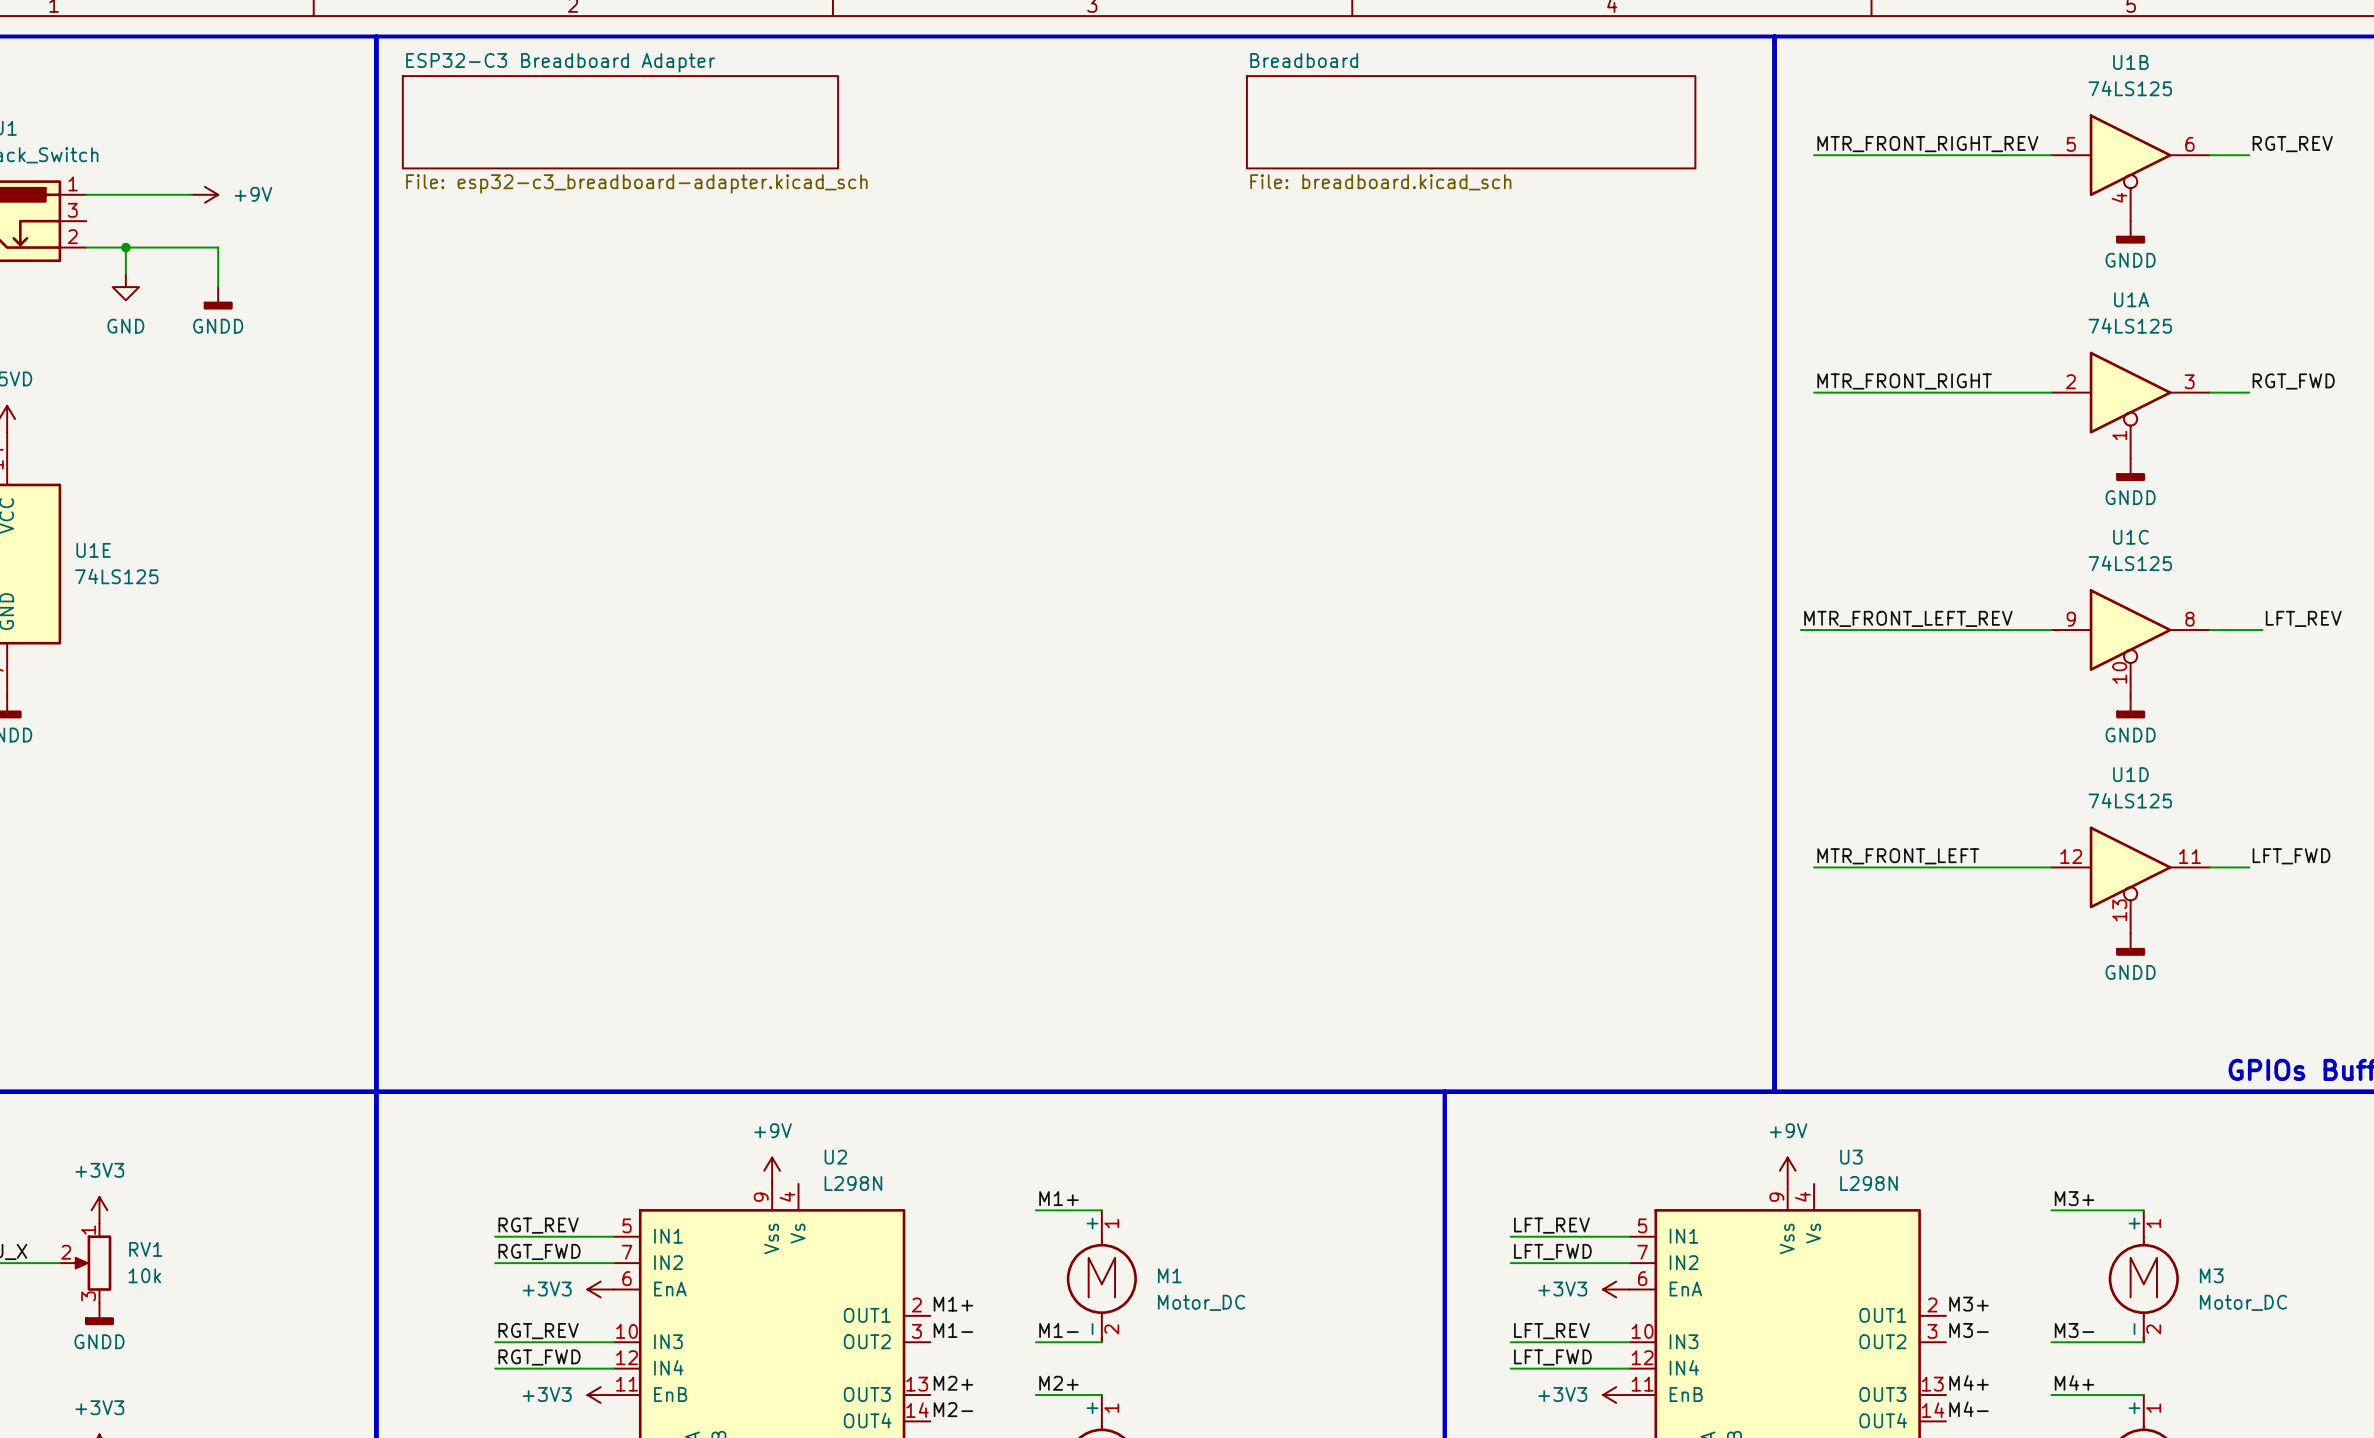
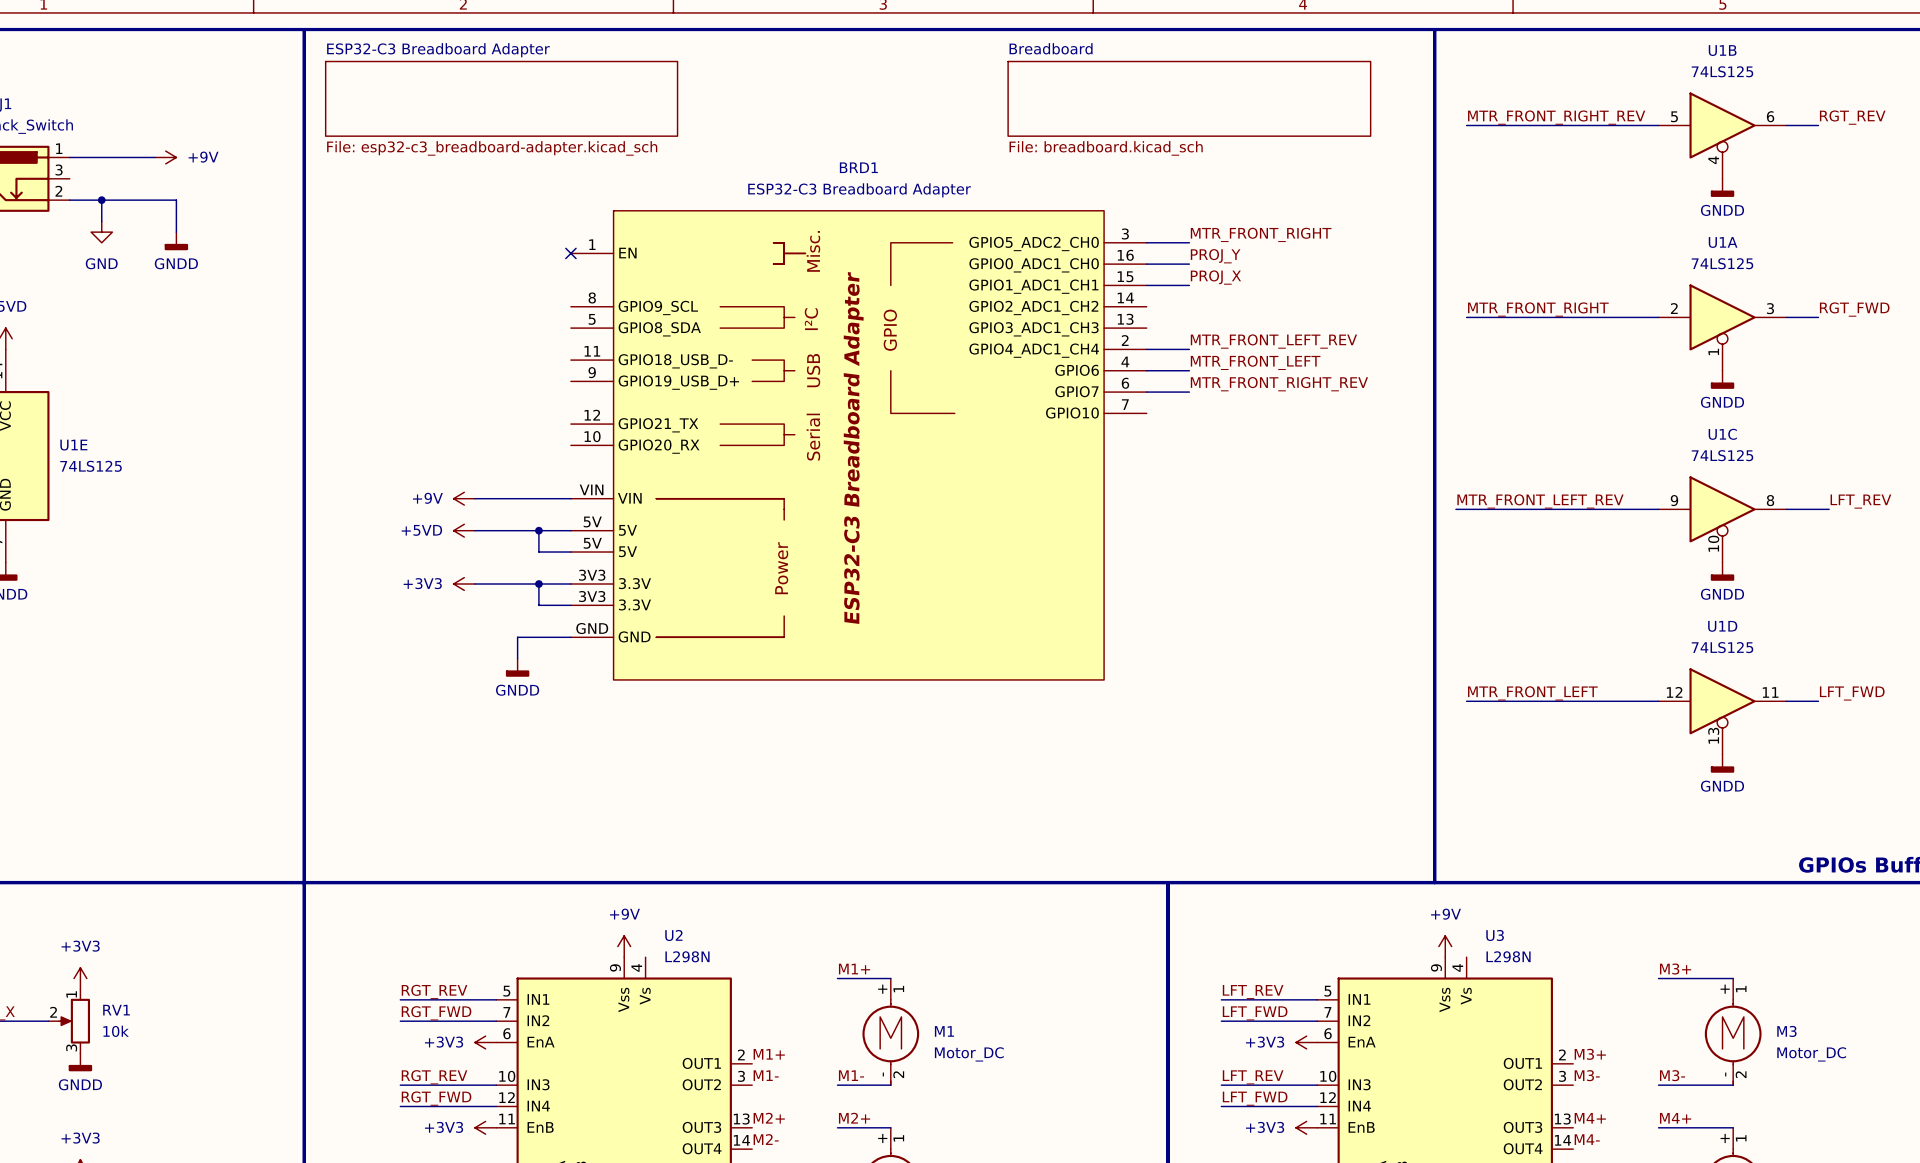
label: none -> MTR_FRONT_RIGHT (1261, 234)
wire: none -> (1146, 242) (1189, 242)
no-connect mark: none -> (570, 253)
label: none -> PROJ_Y (1215, 256)
wire: none -> (1146, 264) (1189, 264)
label: none -> PROJ_X (1215, 277)
wire: none -> (1146, 285) (1189, 285)
label: none -> MTR_FRONT_LEFT_REV (1273, 341)
wire: none -> (1146, 349) (1189, 349)
label: none -> MTR_FRONT_LEFT (1255, 362)
wire: none -> (1146, 370) (1189, 370)
label: none -> MTR_FRONT_RIGHT_REV (1279, 384)
wire: none -> (1146, 392) (1189, 392)
BRD1: none -> ESP32-C3 Breadboard Adapter (858, 445)
power symbol: none -> +9V (464, 498)
wire: none -> (474, 498) (570, 498)
power symbol: none -> +5VD (464, 530)
wire: none -> (474, 530) (570, 530)
wire: none -> (538, 530) (538, 552) (570, 552)
junction: none -> (538, 530)
power symbol: none -> +3V3 (464, 584)
wire: none -> (474, 584) (570, 584)
wire: none -> (538, 584) (538, 605) (570, 605)
junction: none -> (538, 584)
wire: none -> (570, 637) (517, 637) (517, 658)
power symbol: none -> GNDD (517, 667)

